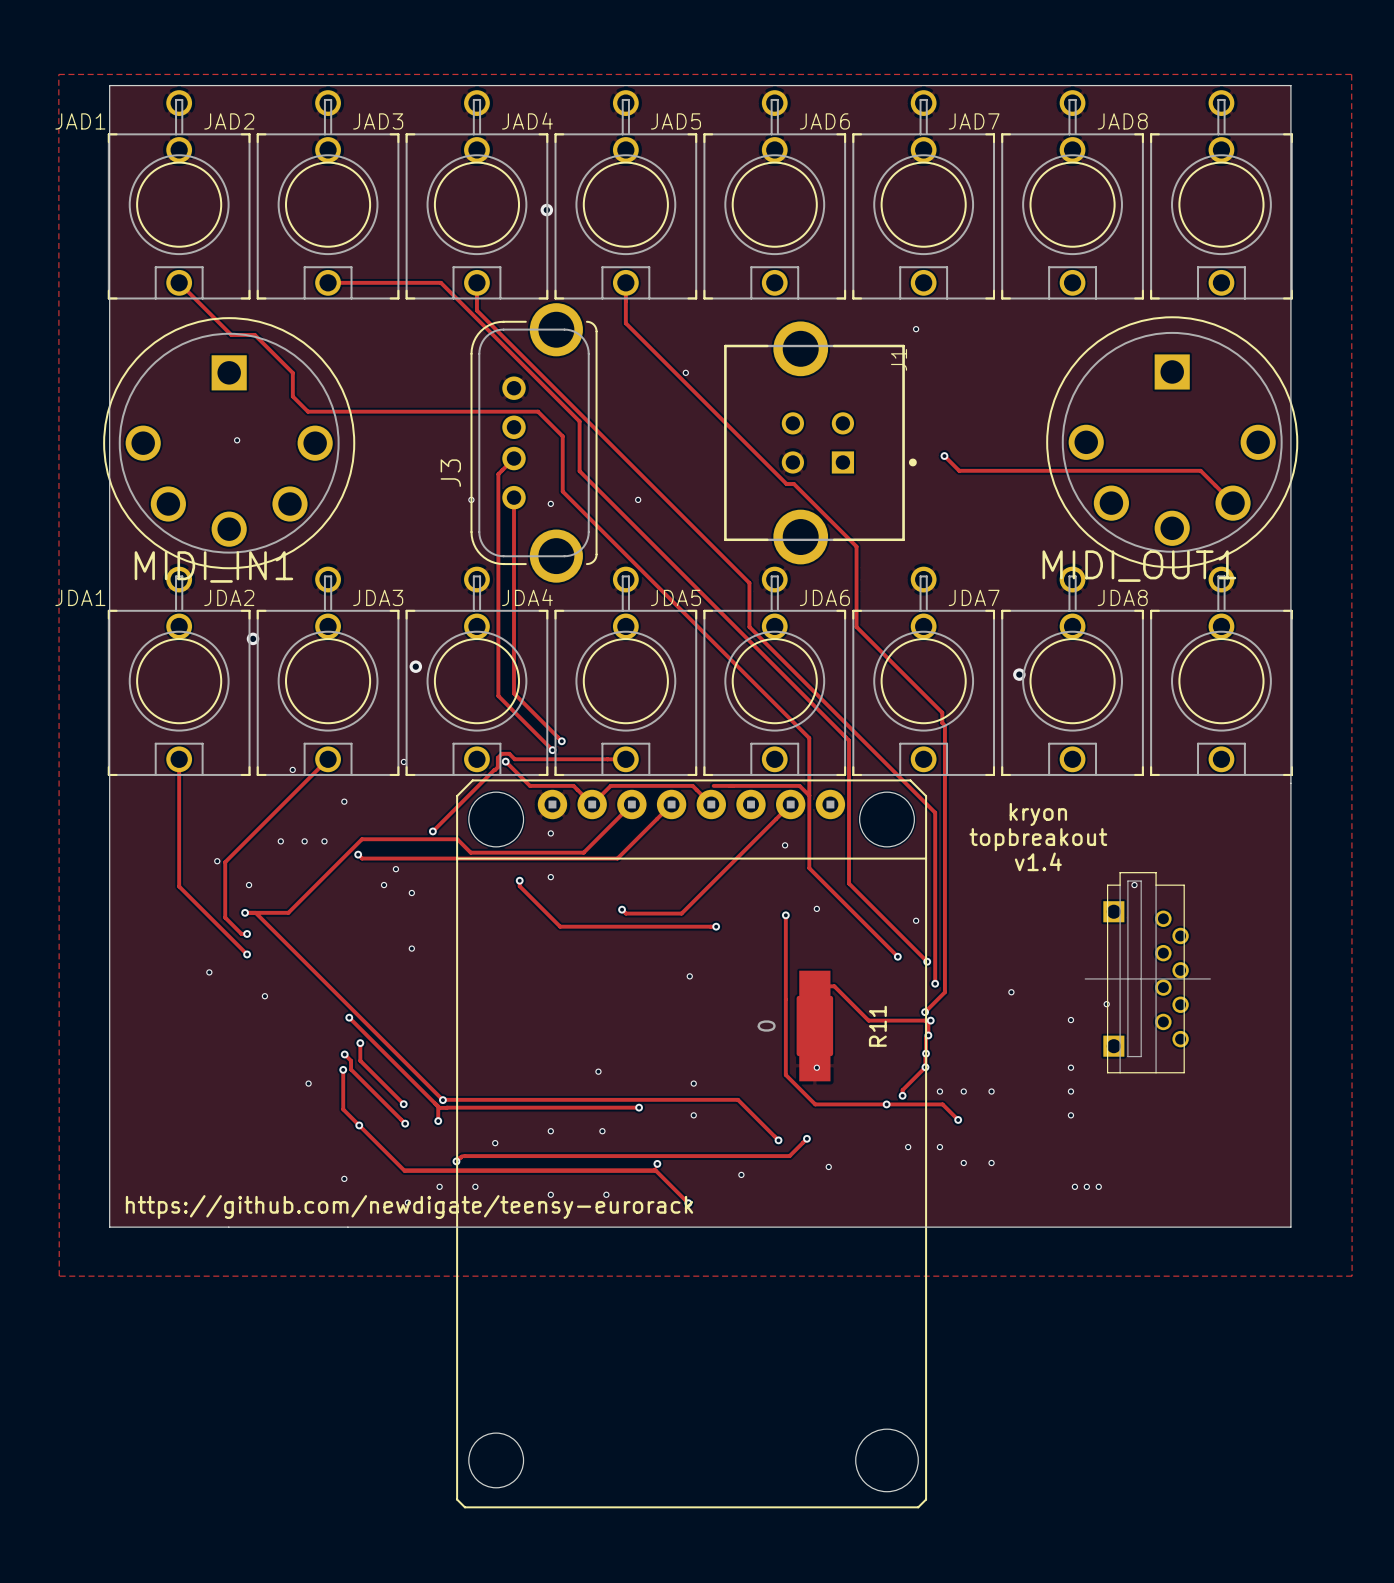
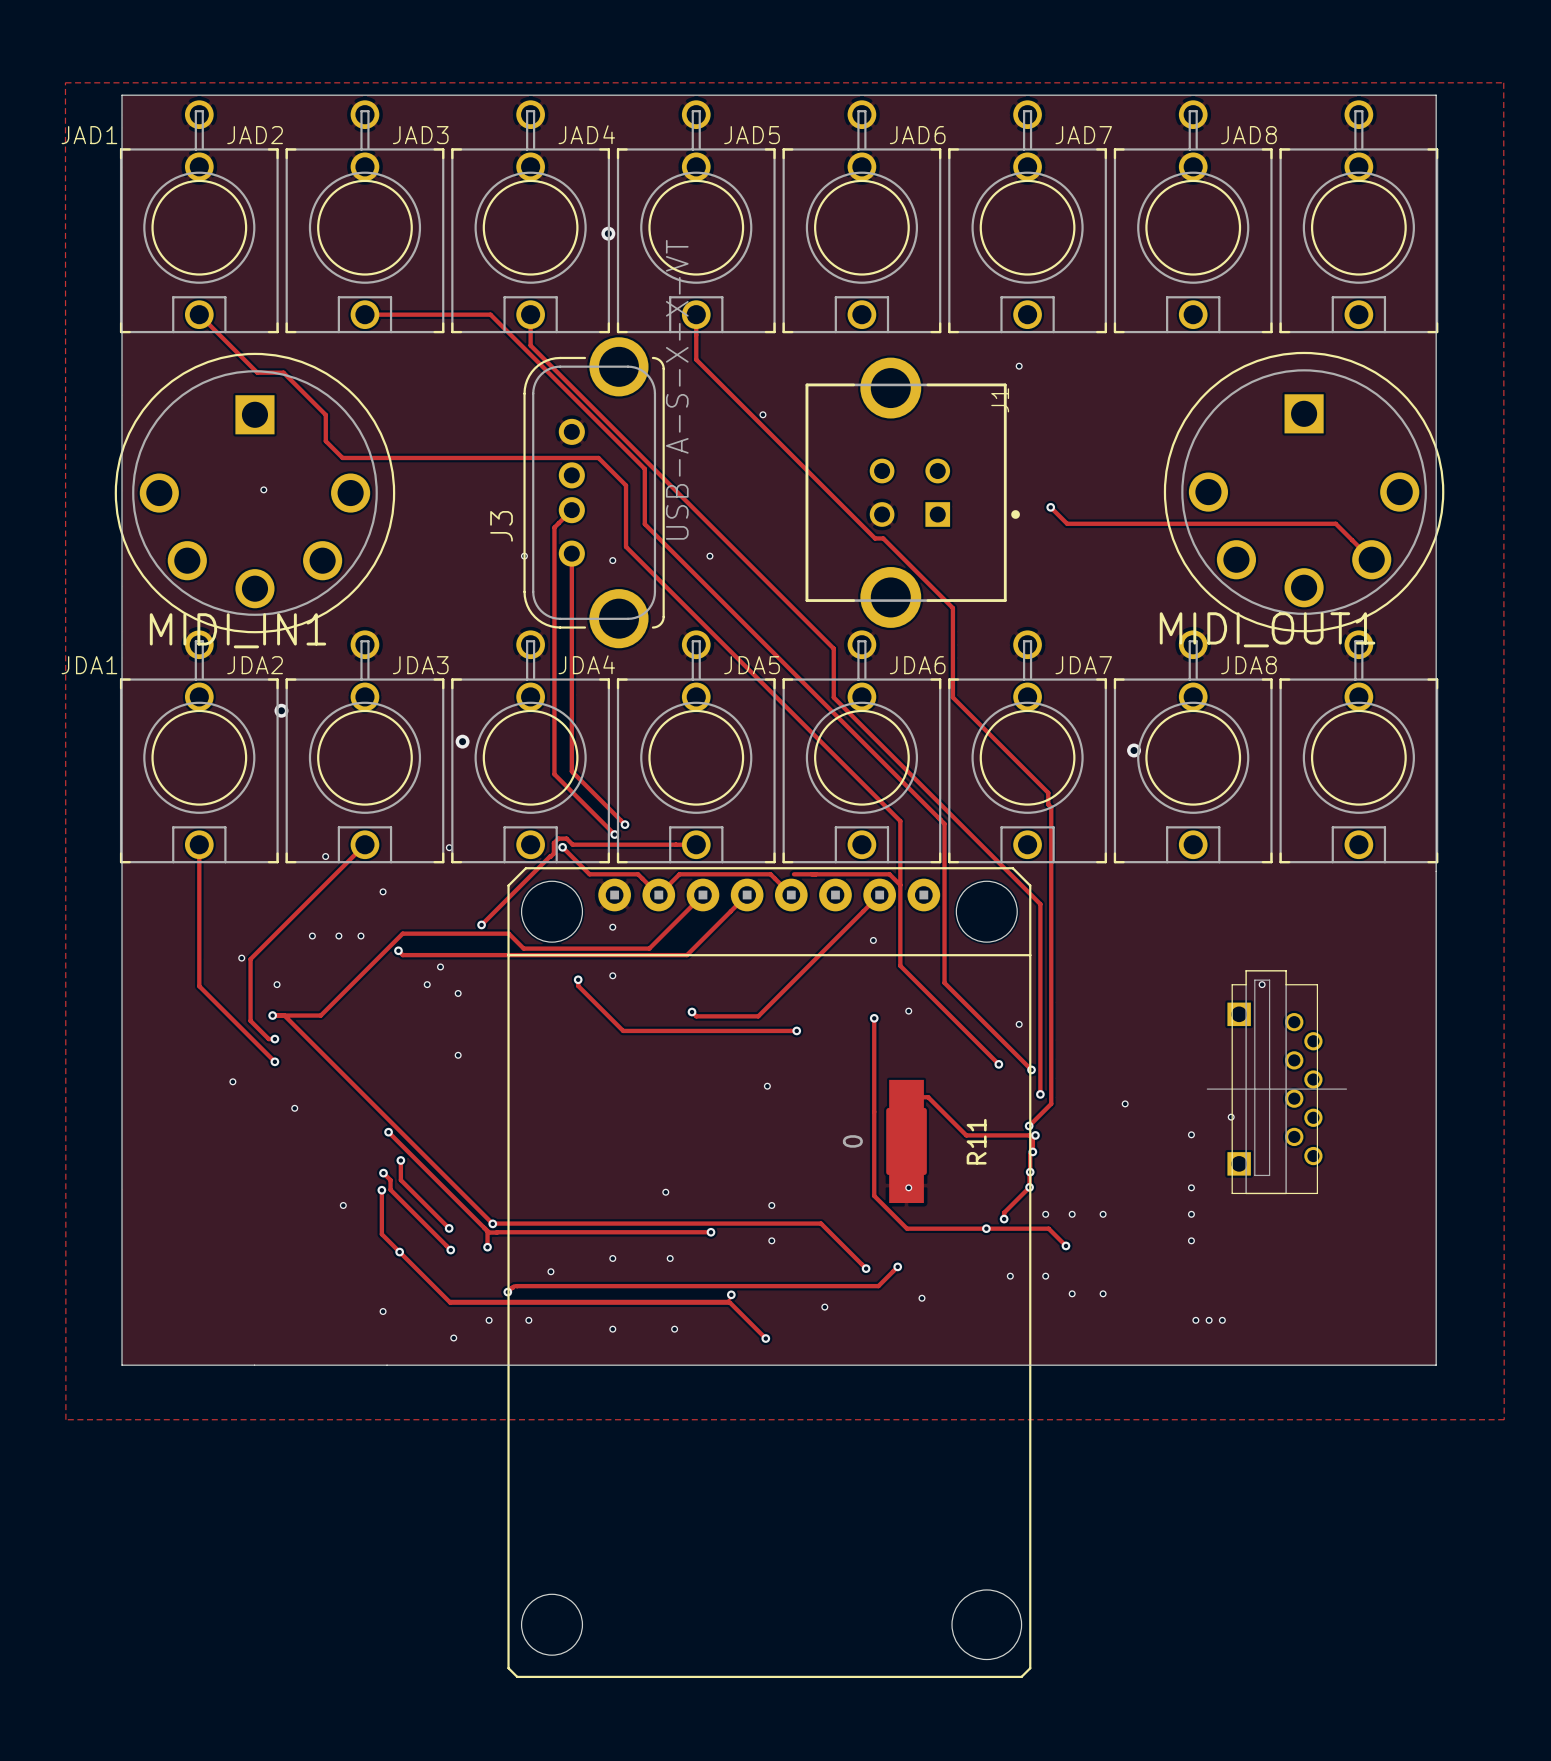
J3 value: none -> USB-A-S-X-X-VT (677, 389)
text: kryon (1038, 814) -> none
text: topbreakout (1038, 839) -> none
text: v1.4 (1038, 861) -> none
text: https://github.com/newdigate/teensy-eurorack (409, 1207) -> none

